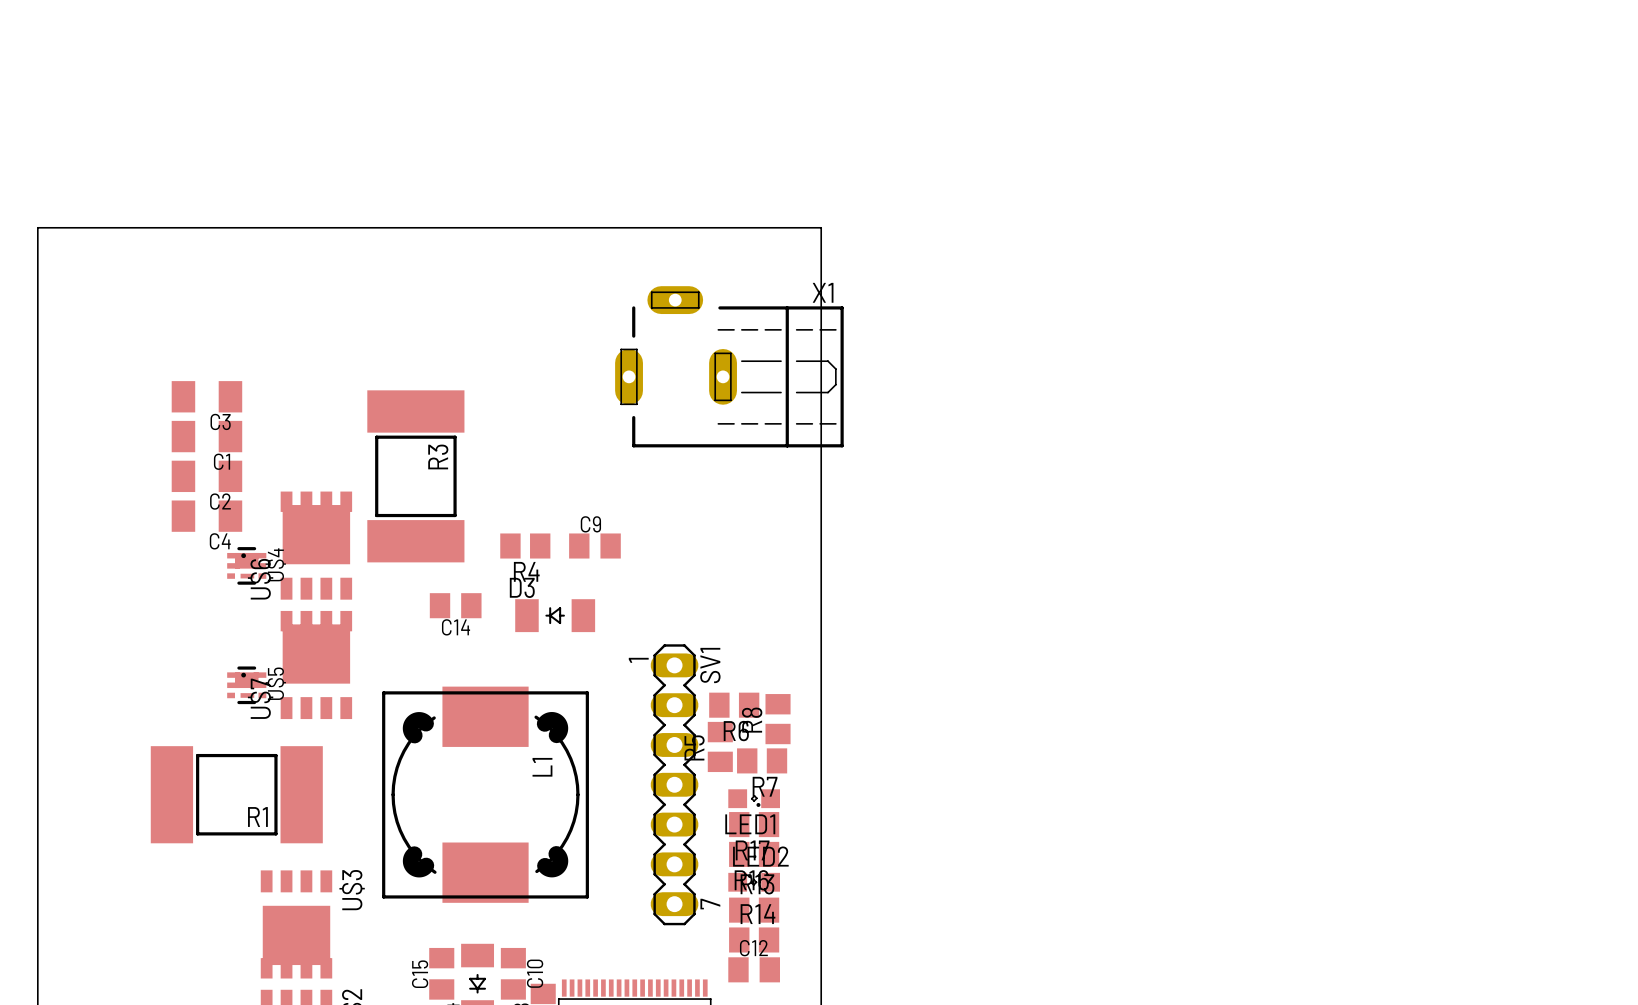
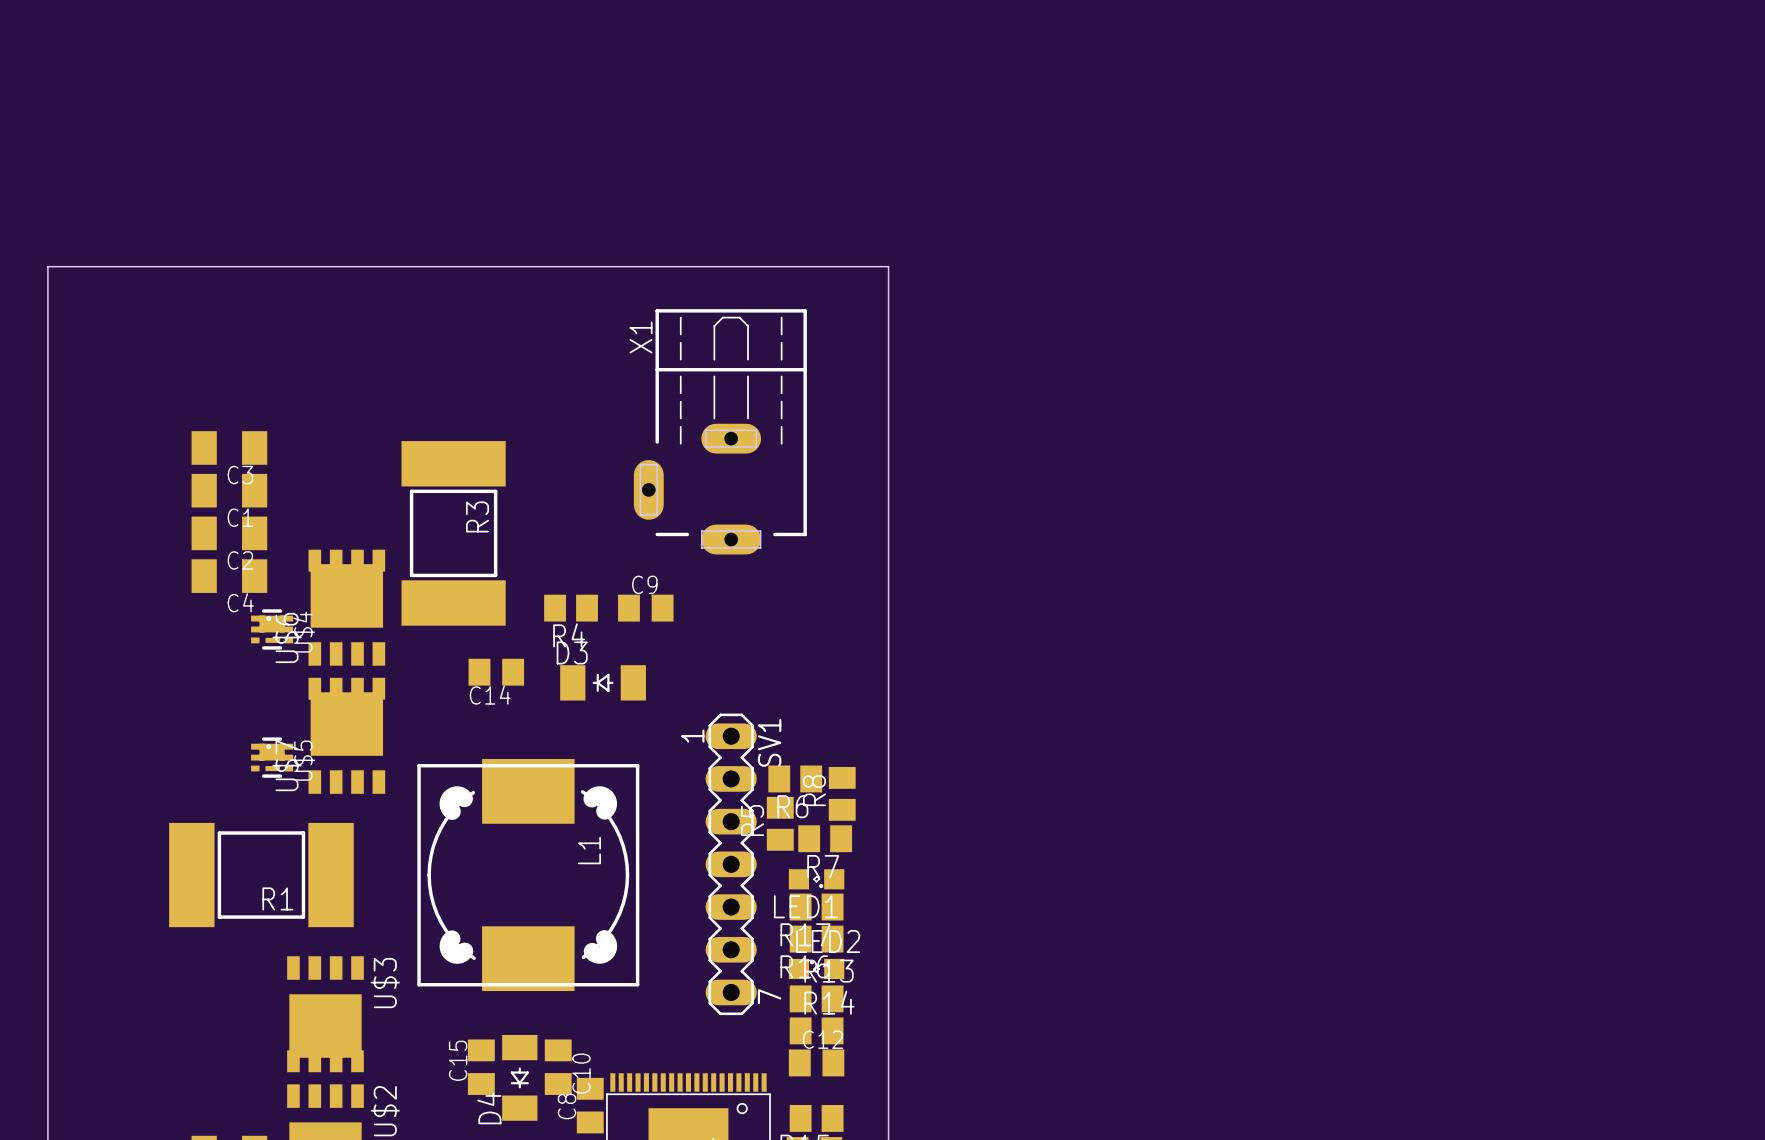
X1 rotation: 0° (729, 366) -> 90° counterclockwise (720, 431)

